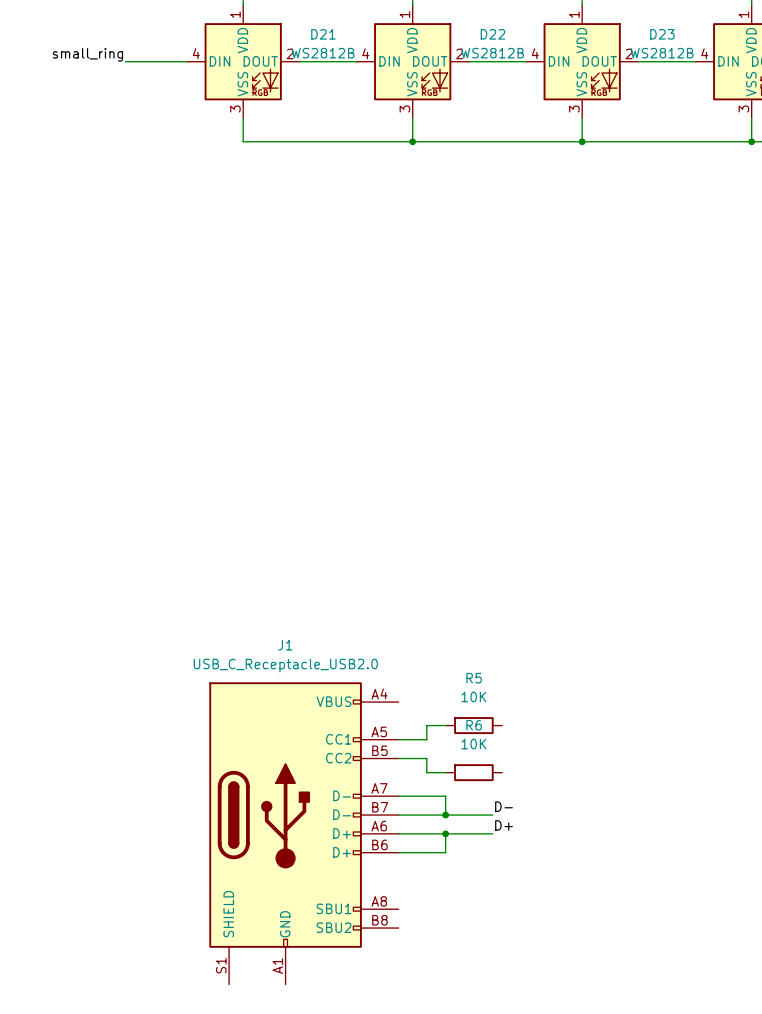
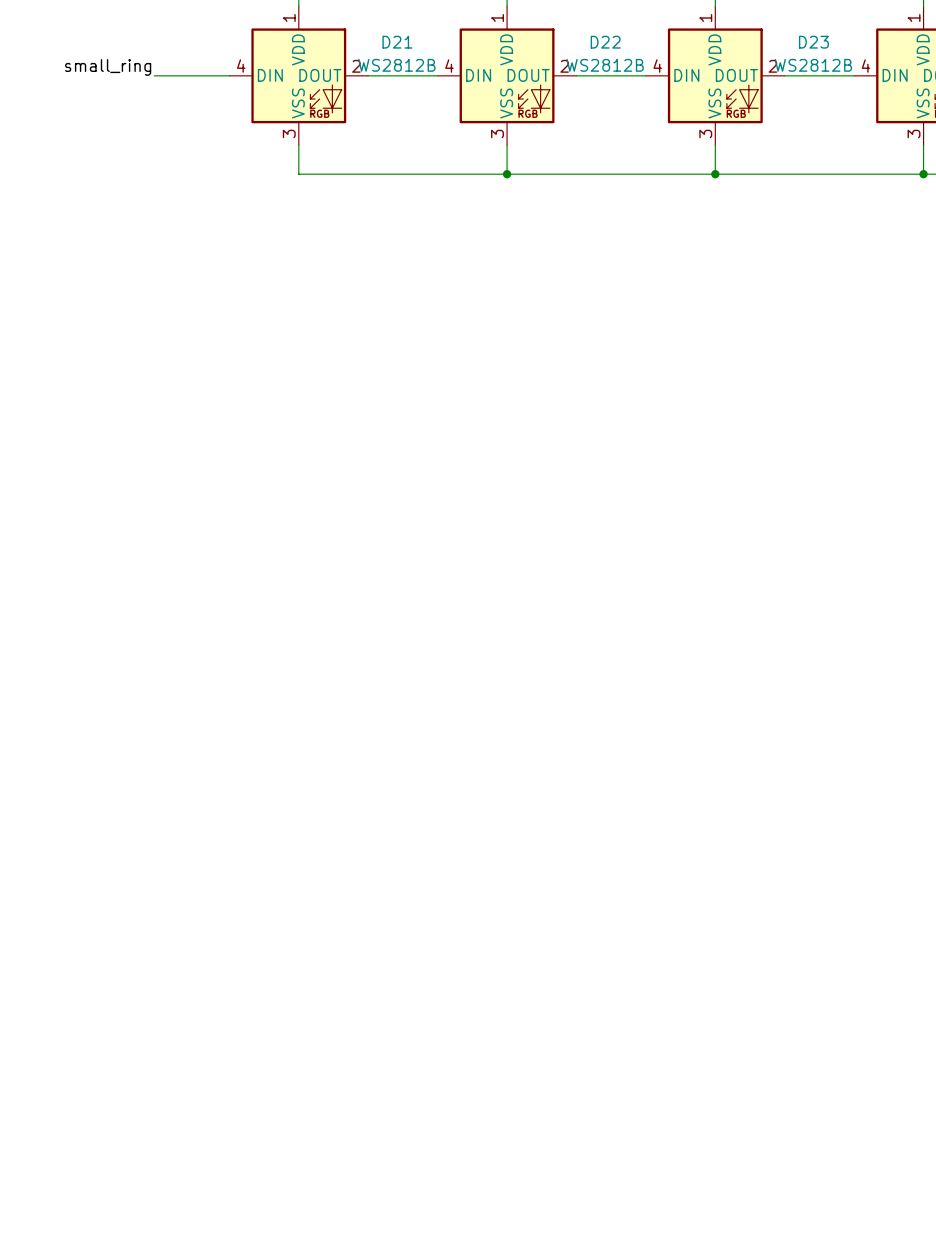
wire: (445, 725) (426, 725) (426, 739) (398, 739) -> none
R5: 10K (473, 725) -> none
wire: (398, 758) (426, 758) (426, 772) (445, 772) -> none
R6: 10K (473, 772) -> none
wire: (398, 796) (445, 796) (445, 815) -> none
label: D- (504, 806) -> none
wire: (398, 815) (492, 815) -> none
junction: (445, 815) -> none
label: D+ (504, 825) -> none
J1: USB_C_Receptacle_USB2.0 (303, 833) -> none
wire: (398, 833) (492, 833) -> none
wire: (445, 833) (445, 852) (398, 852) -> none
junction: (445, 833) -> none

